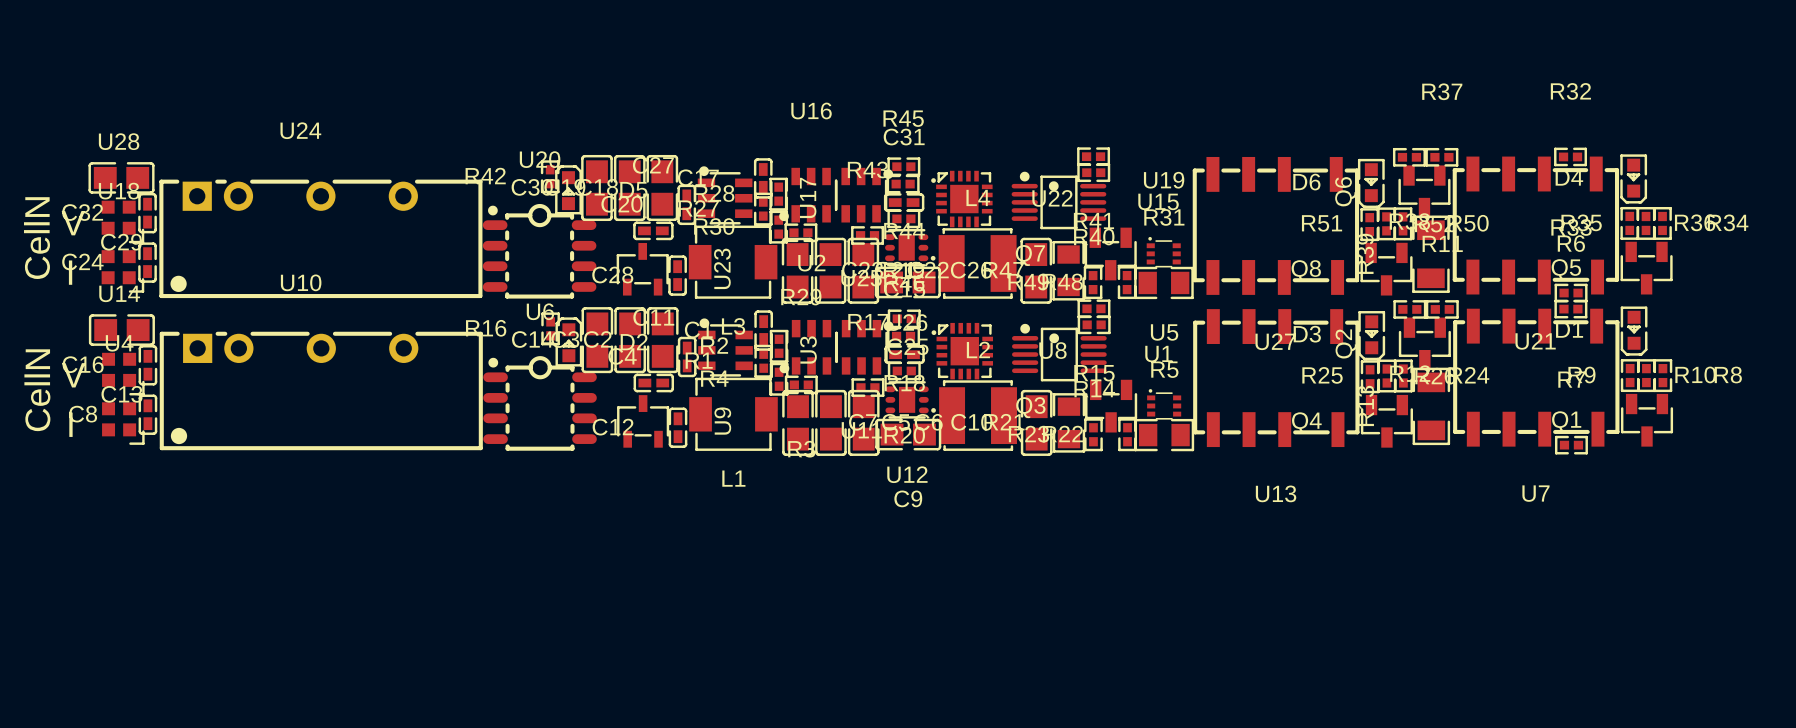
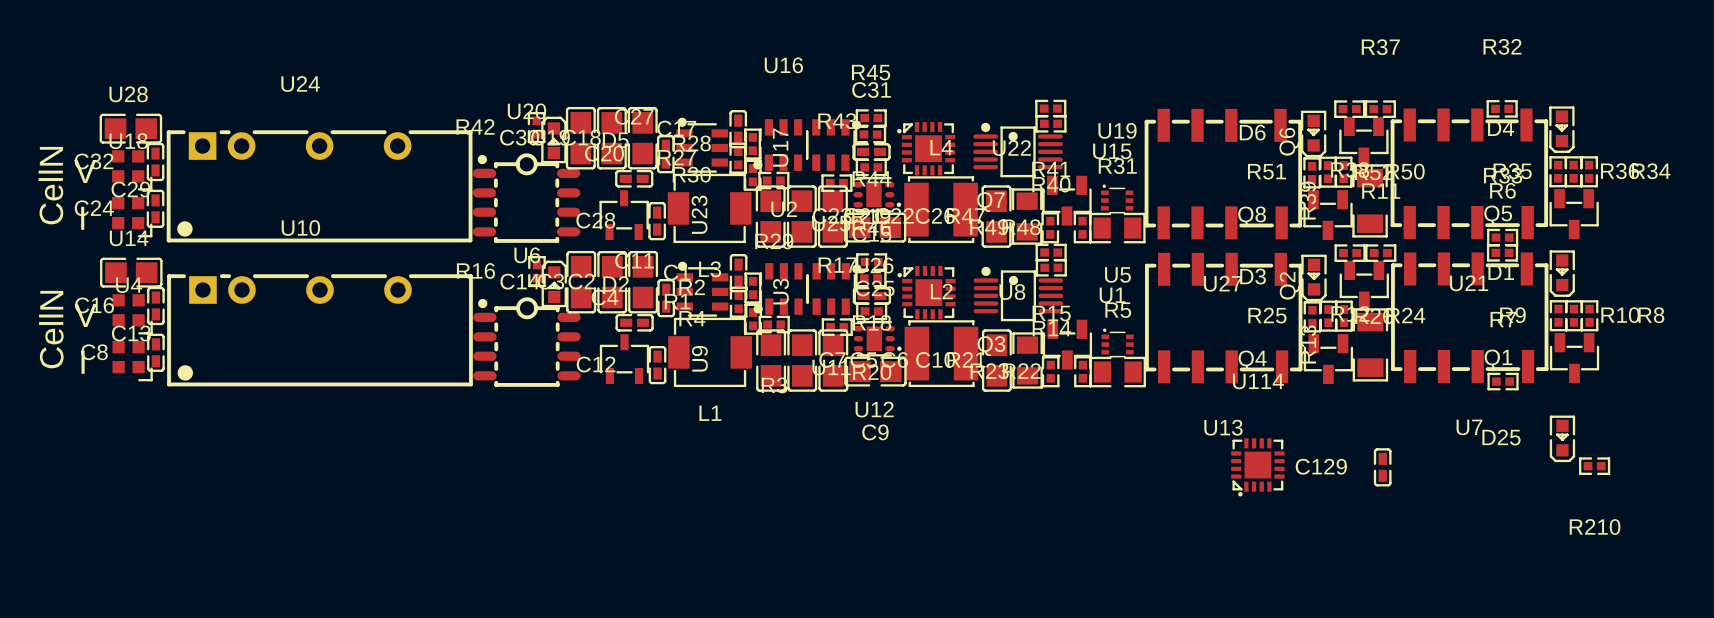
D25: none -> (1562, 438)
R210: none -> (1594, 466)
U114: none -> (1257, 467)
C129: none -> (1382, 467)

